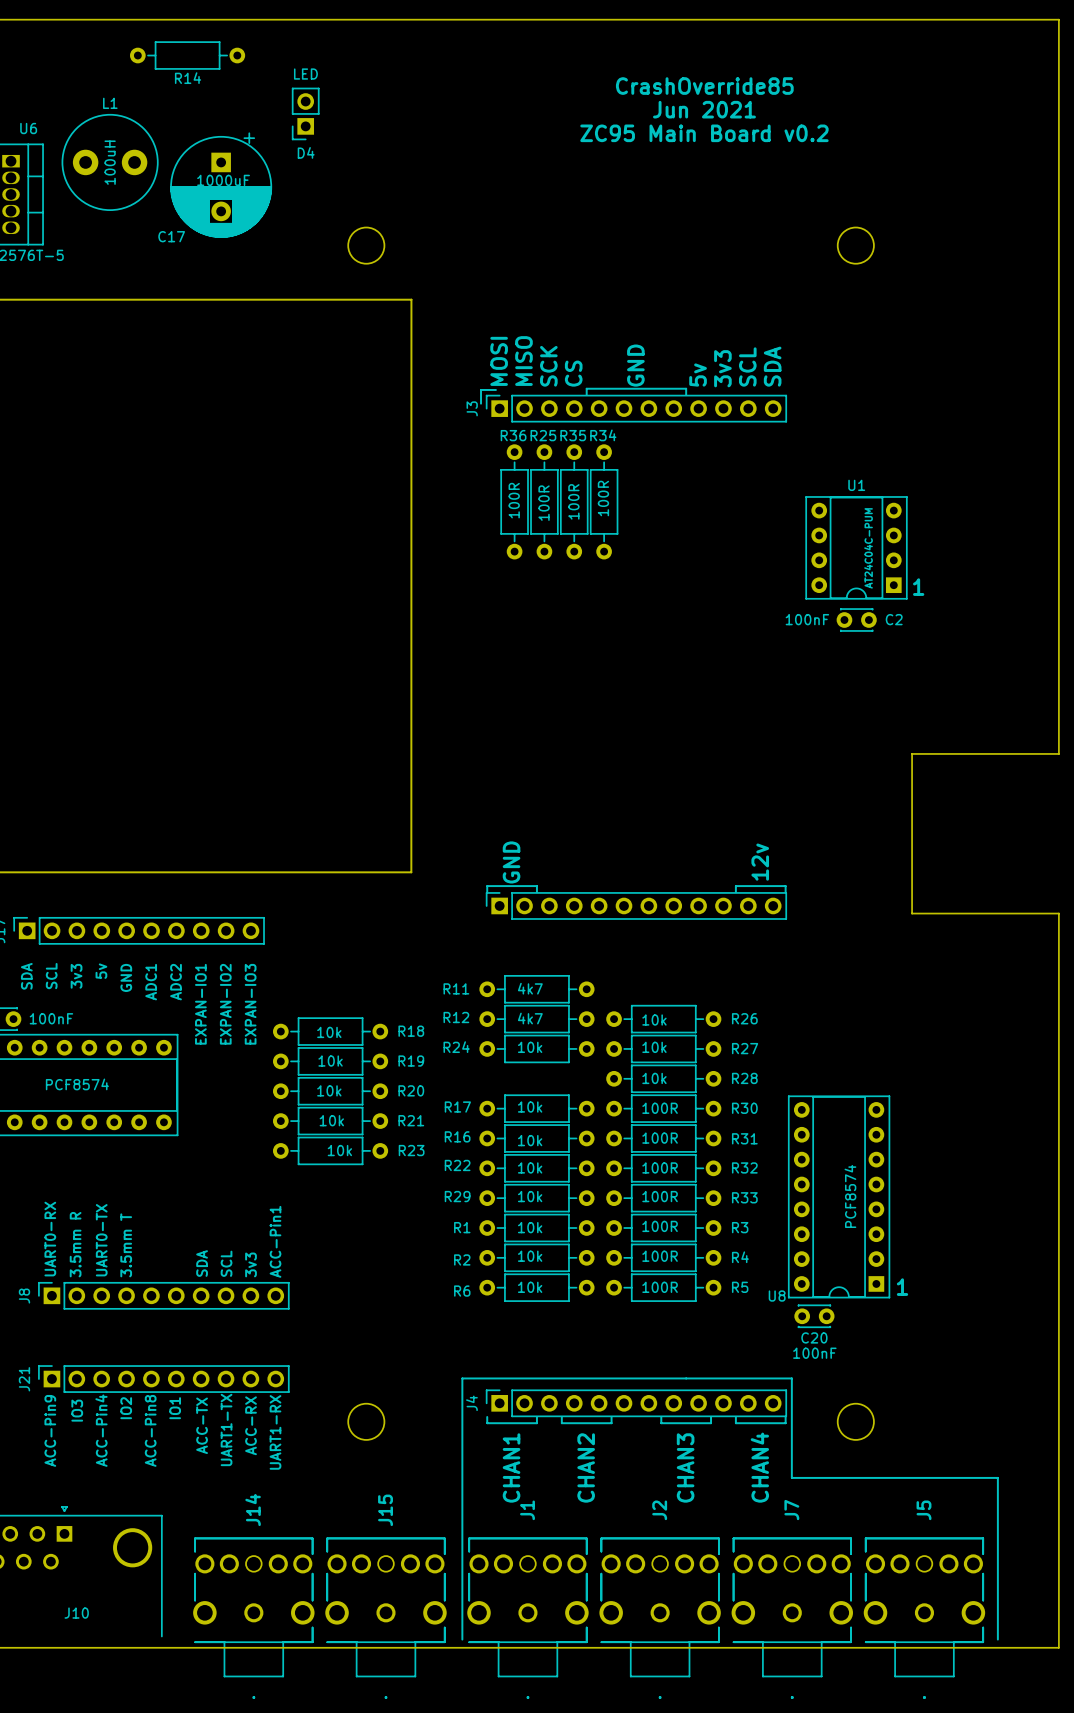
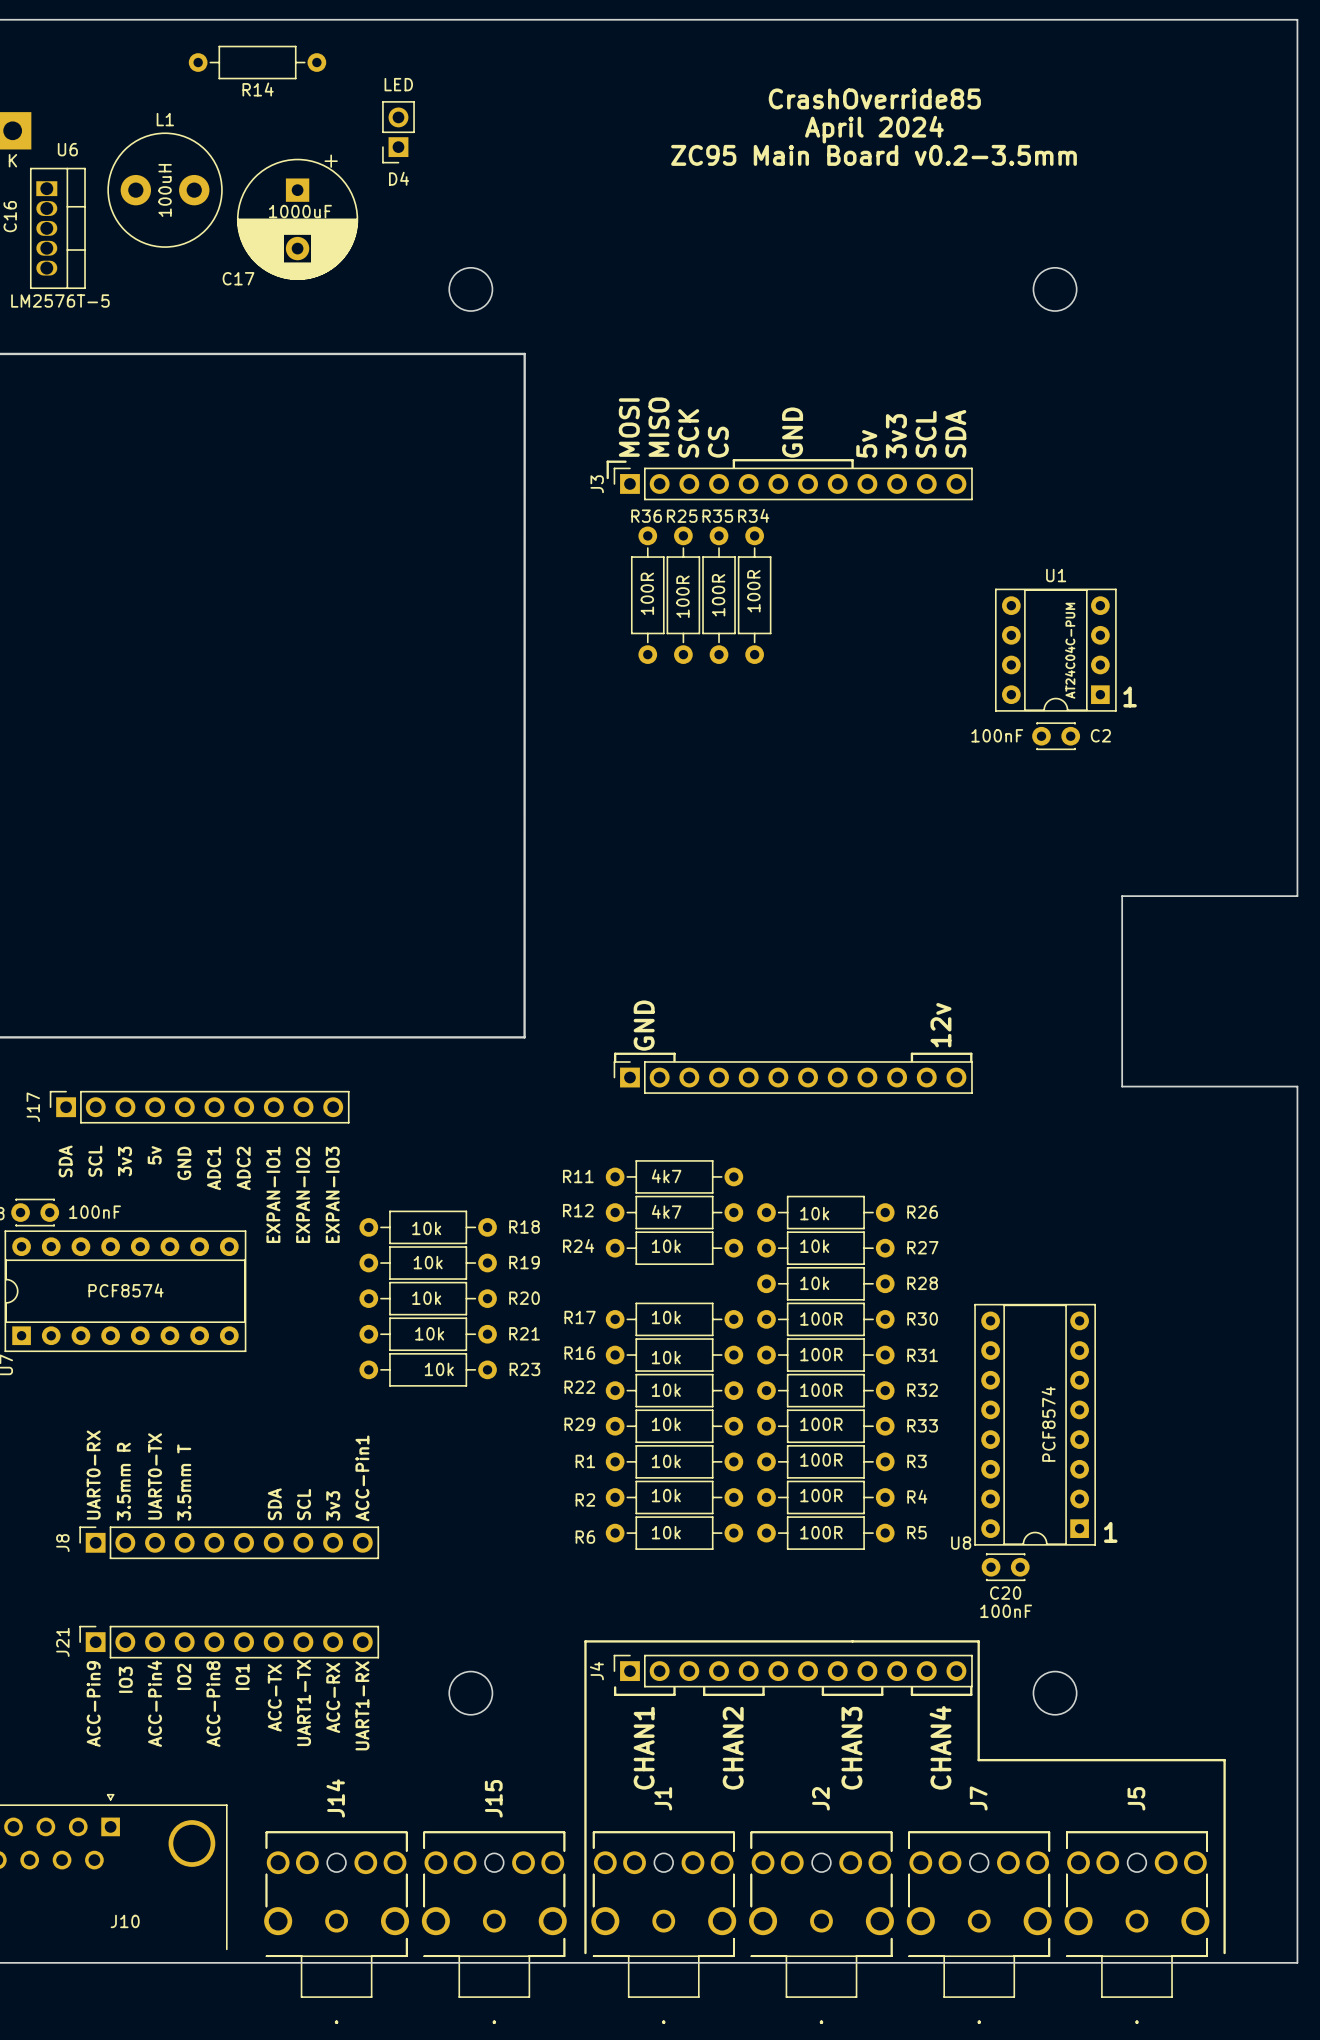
text: Jun 2021 (704, 109) -> April 2024 (874, 129)
text: ZC95 Main Board v0.2 (704, 133) -> ZC95 Main Board v0.2-3.5mm (873, 155)

